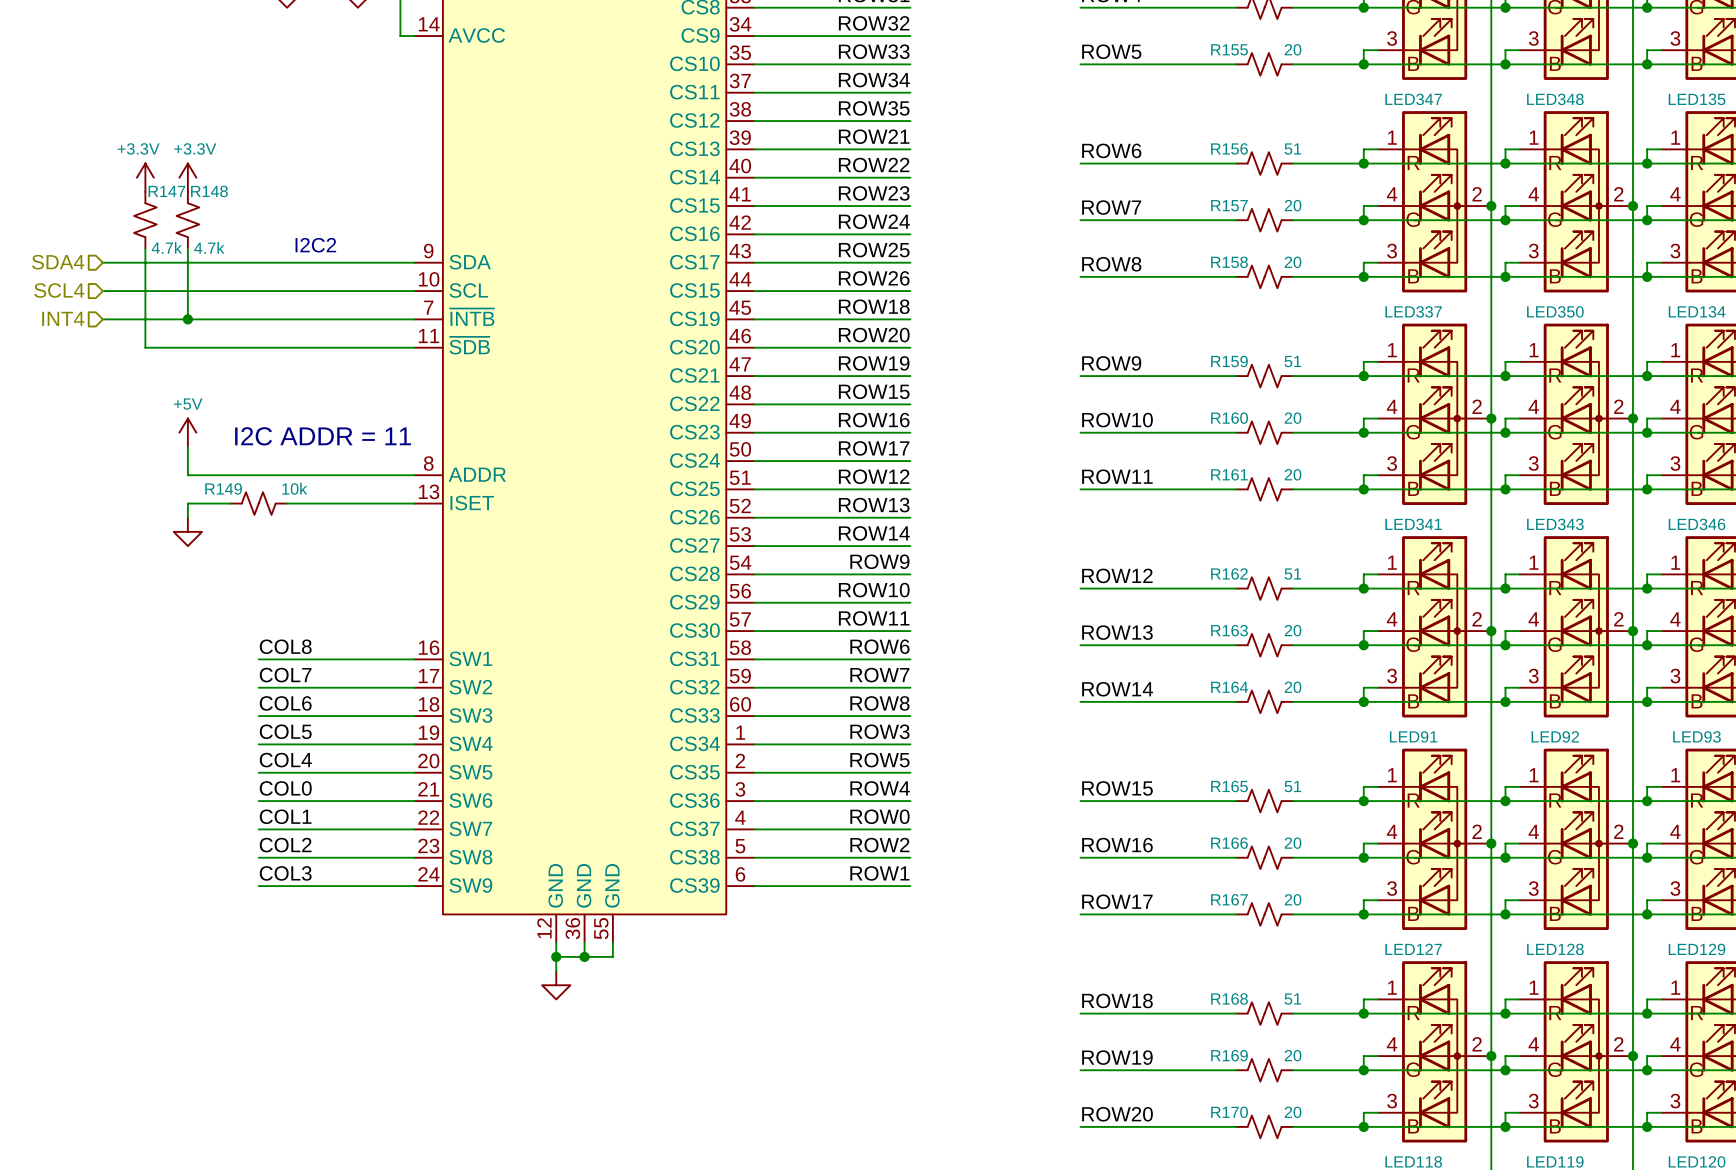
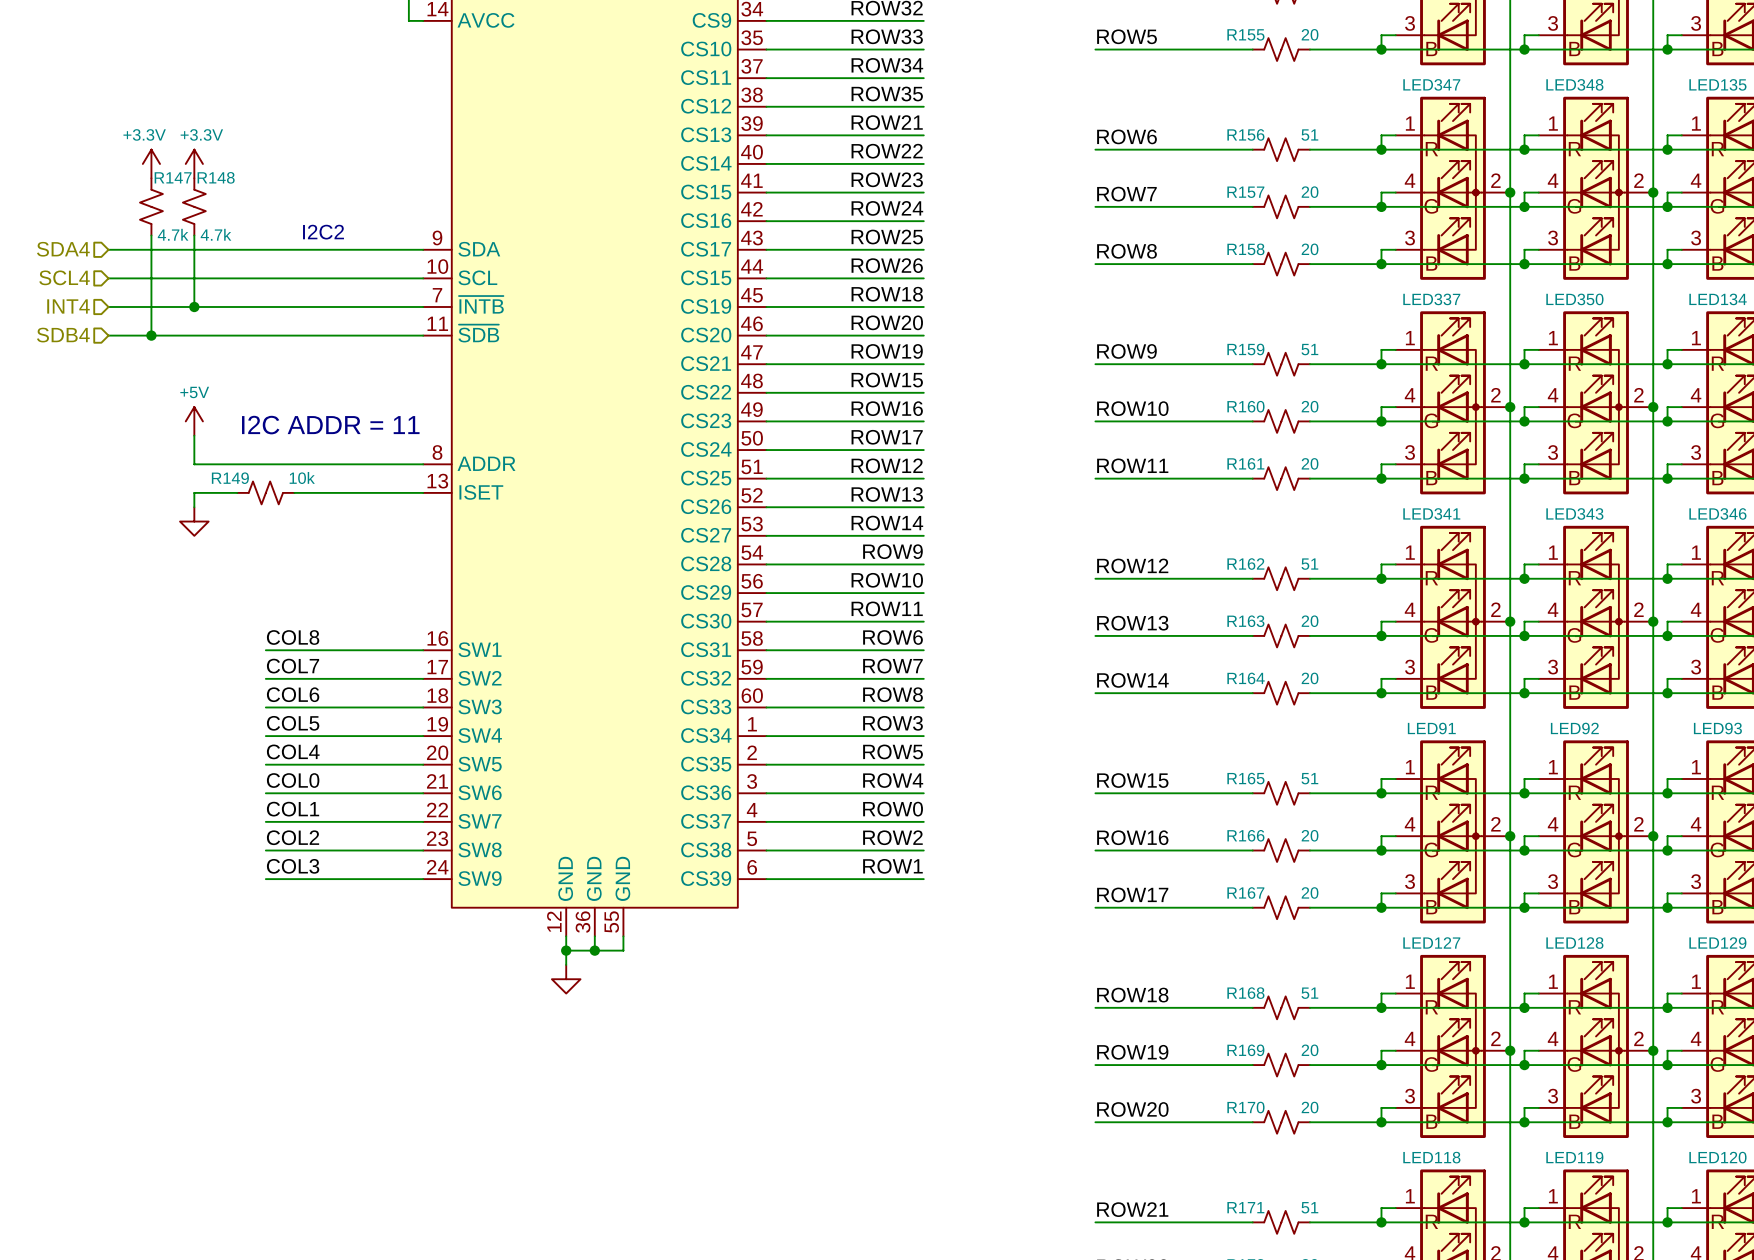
hierarchical label: none -> SDB4 (63, 335)
wire: none -> (108, 335) (151, 335)
junction: none -> (151, 335)

